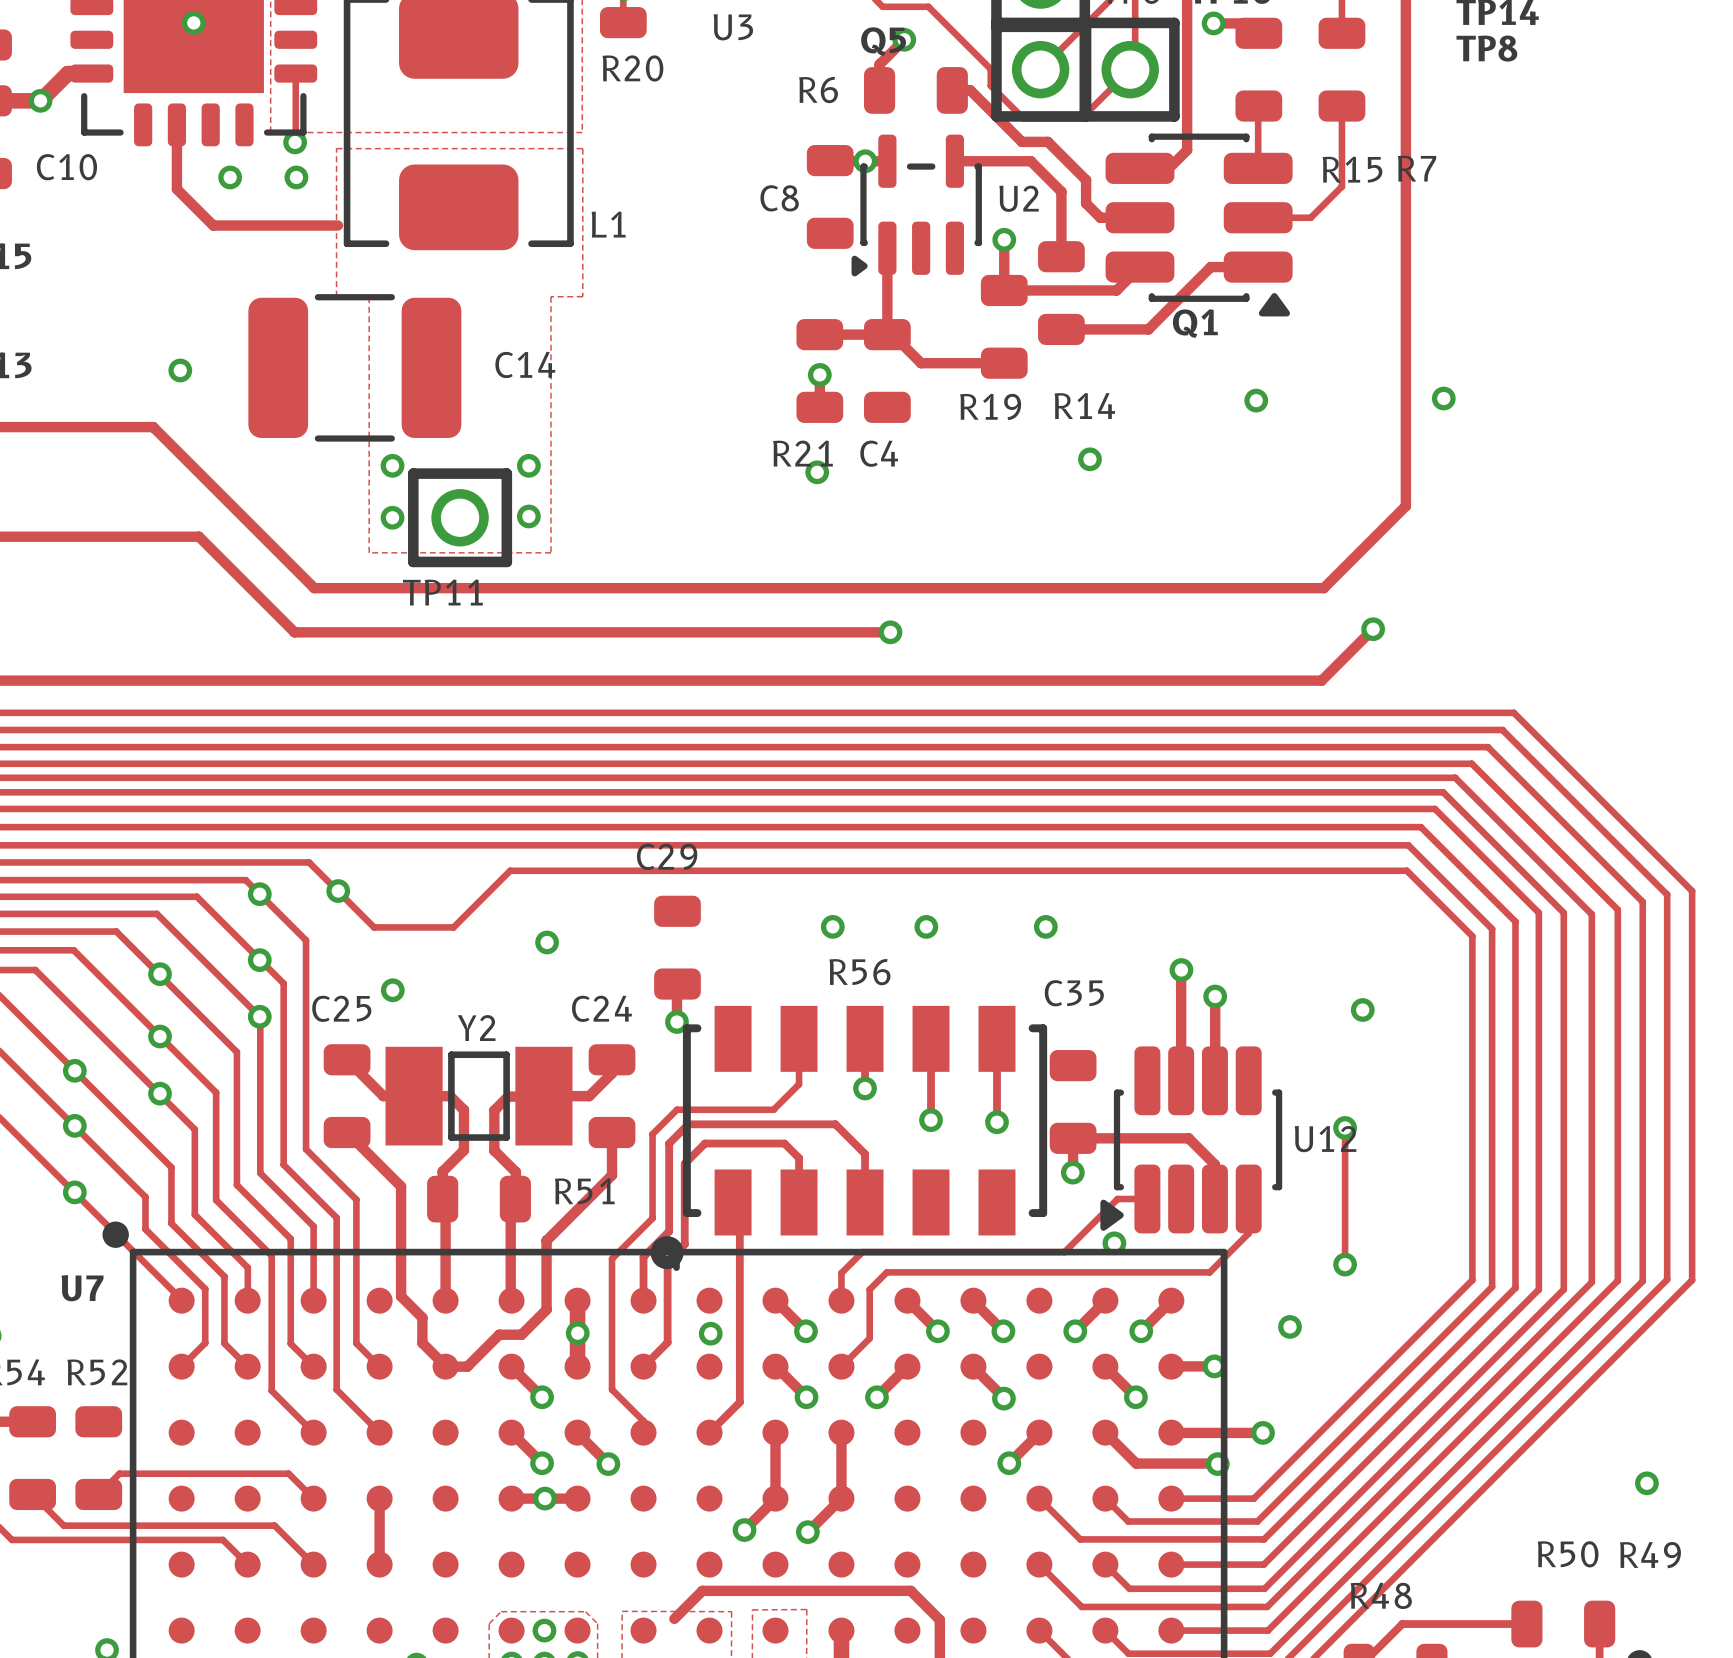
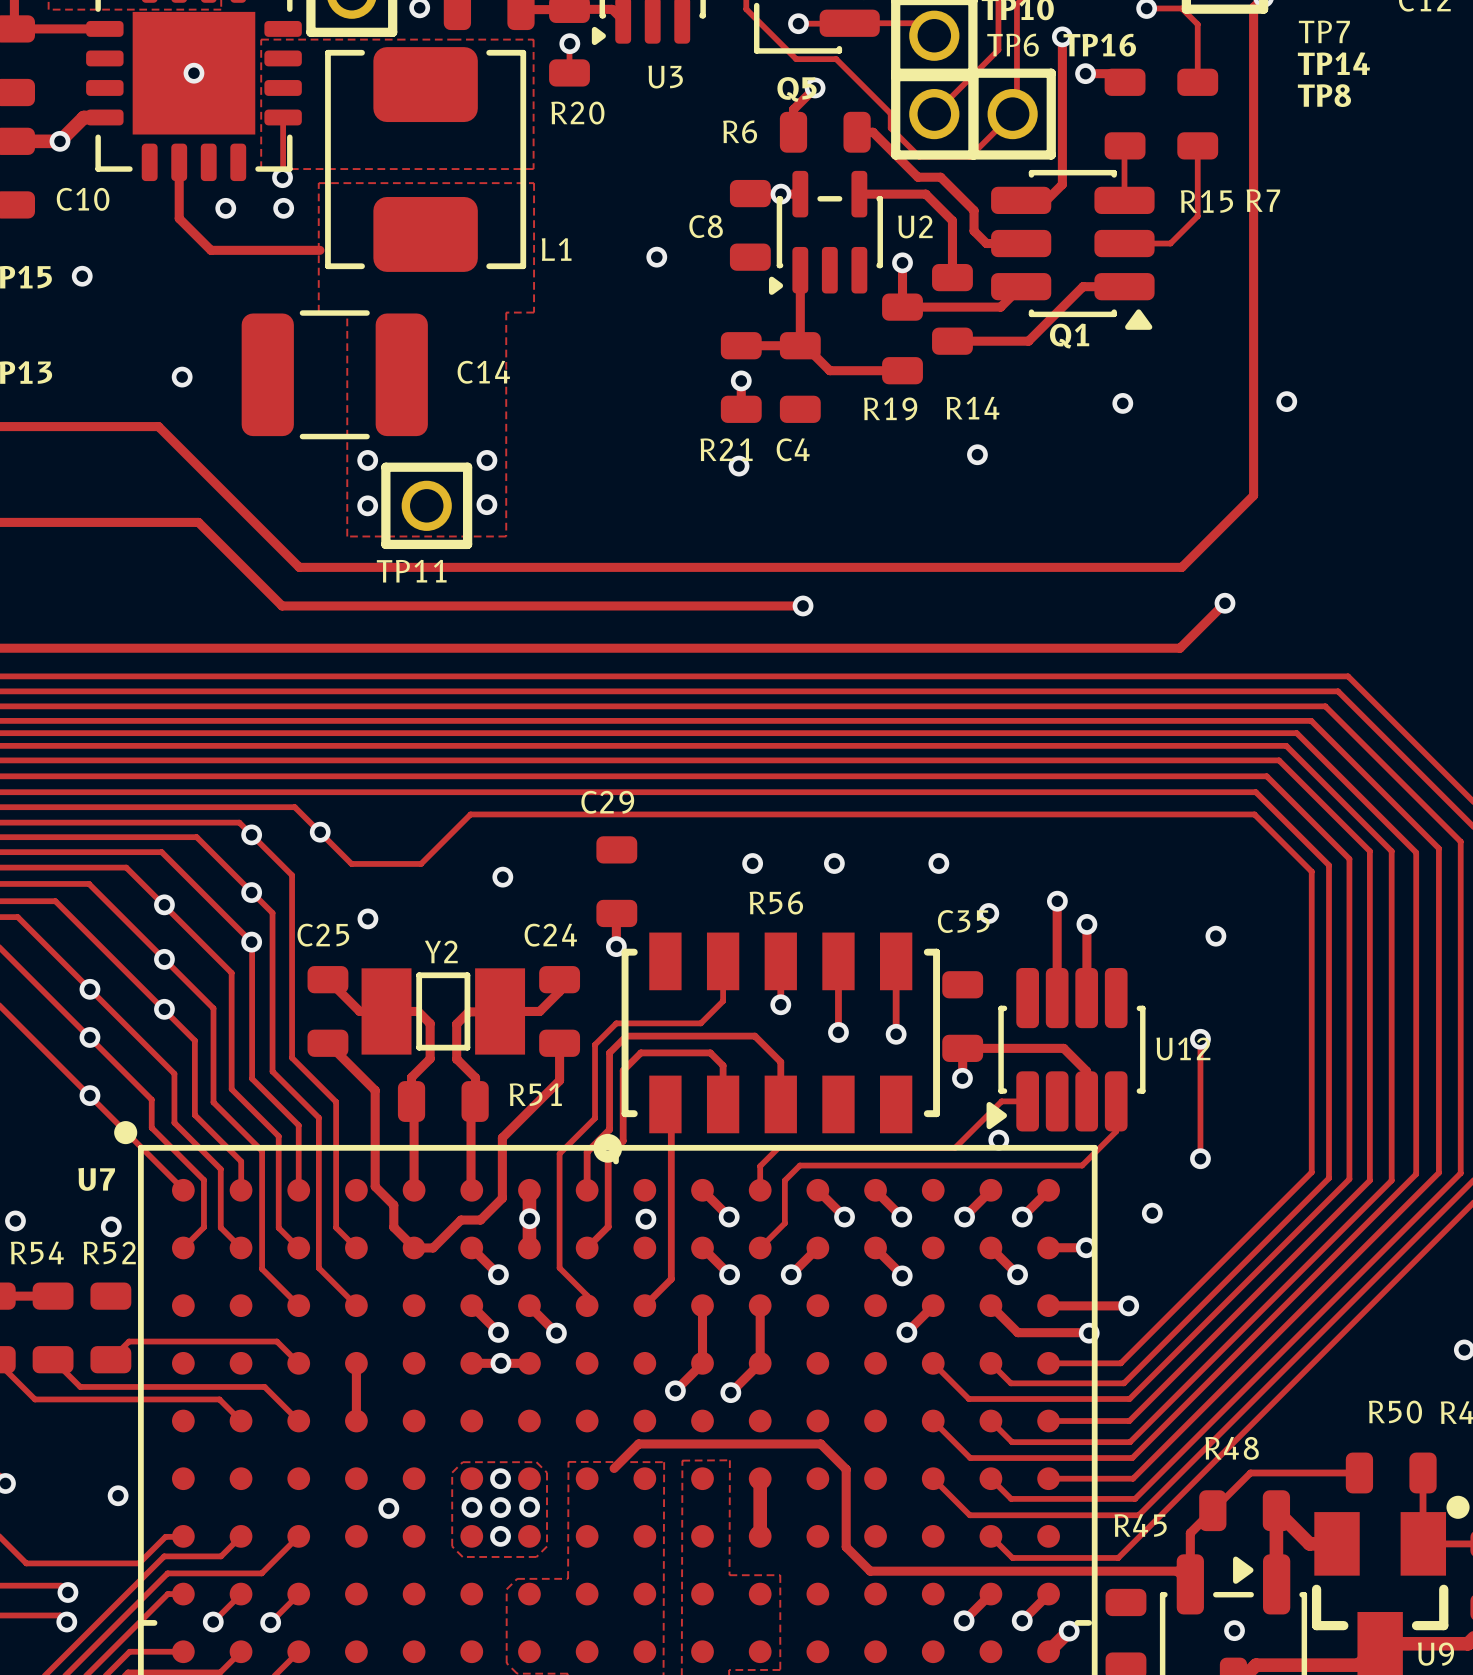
via: none -> (656, 257)
via: none -> (82, 276)
via: none -> (988, 913)
via: none -> (111, 1226)

